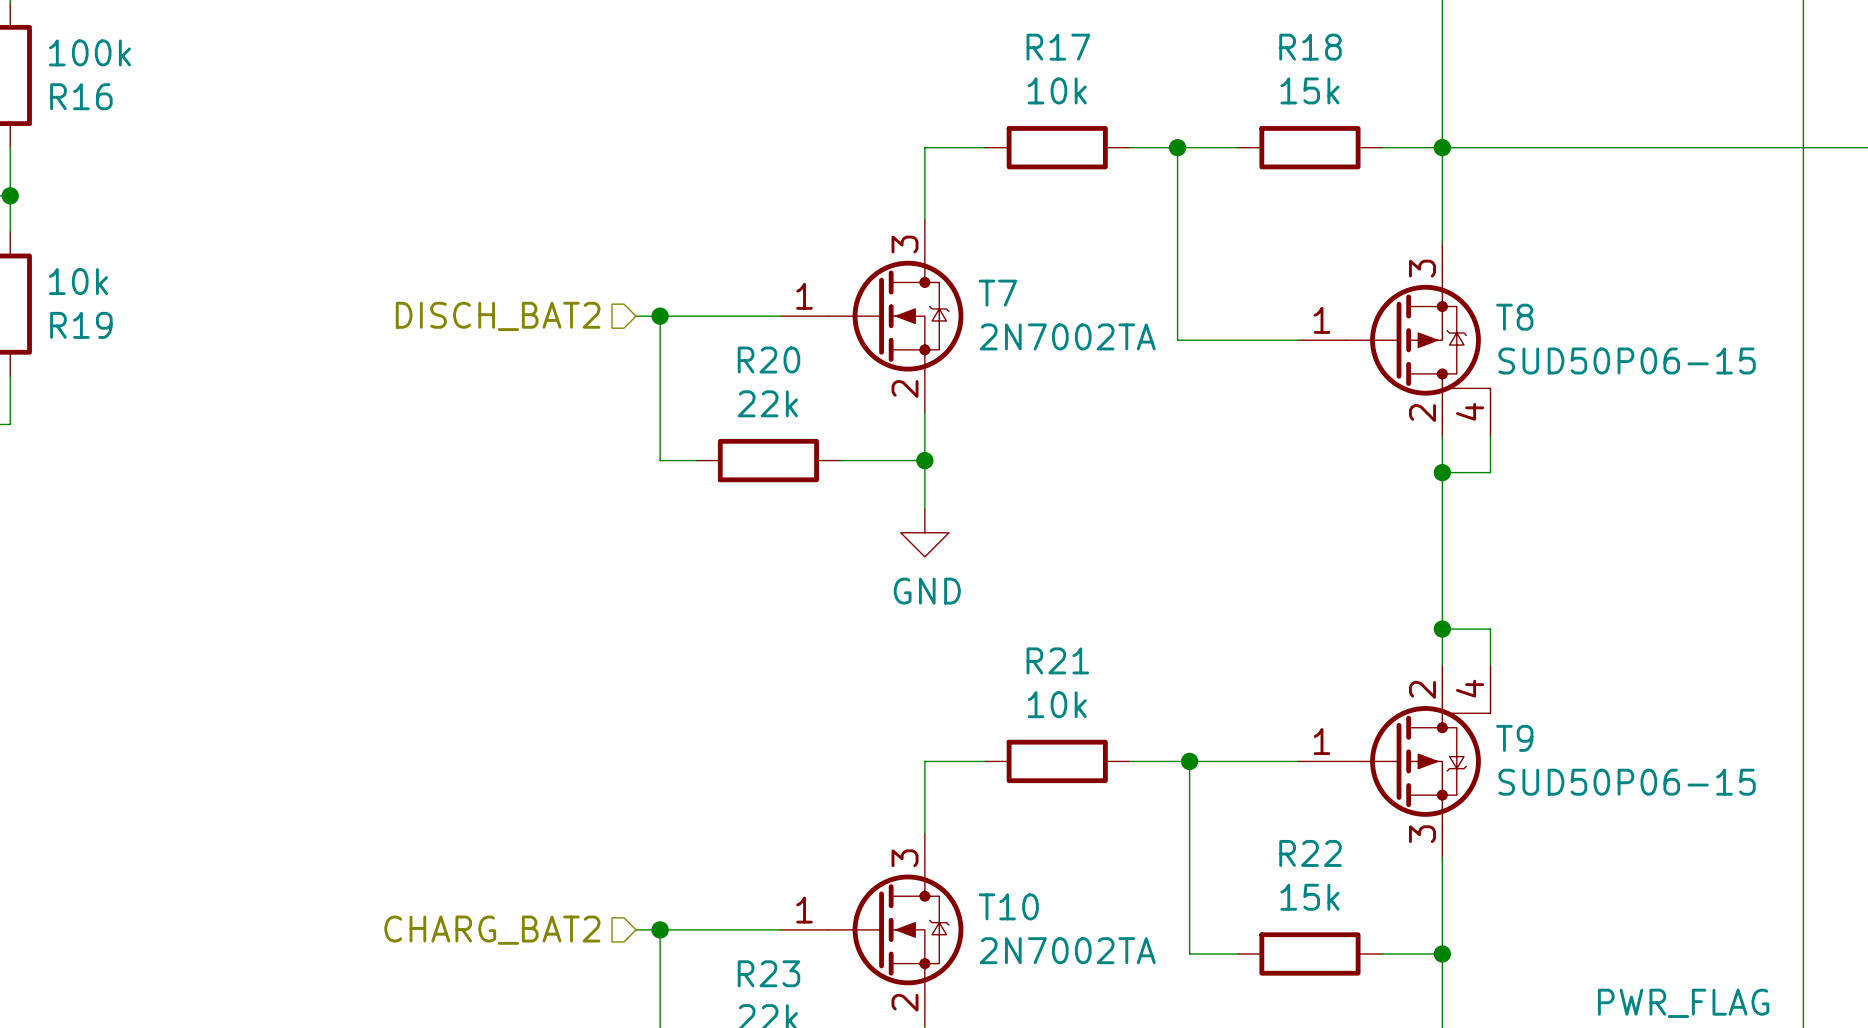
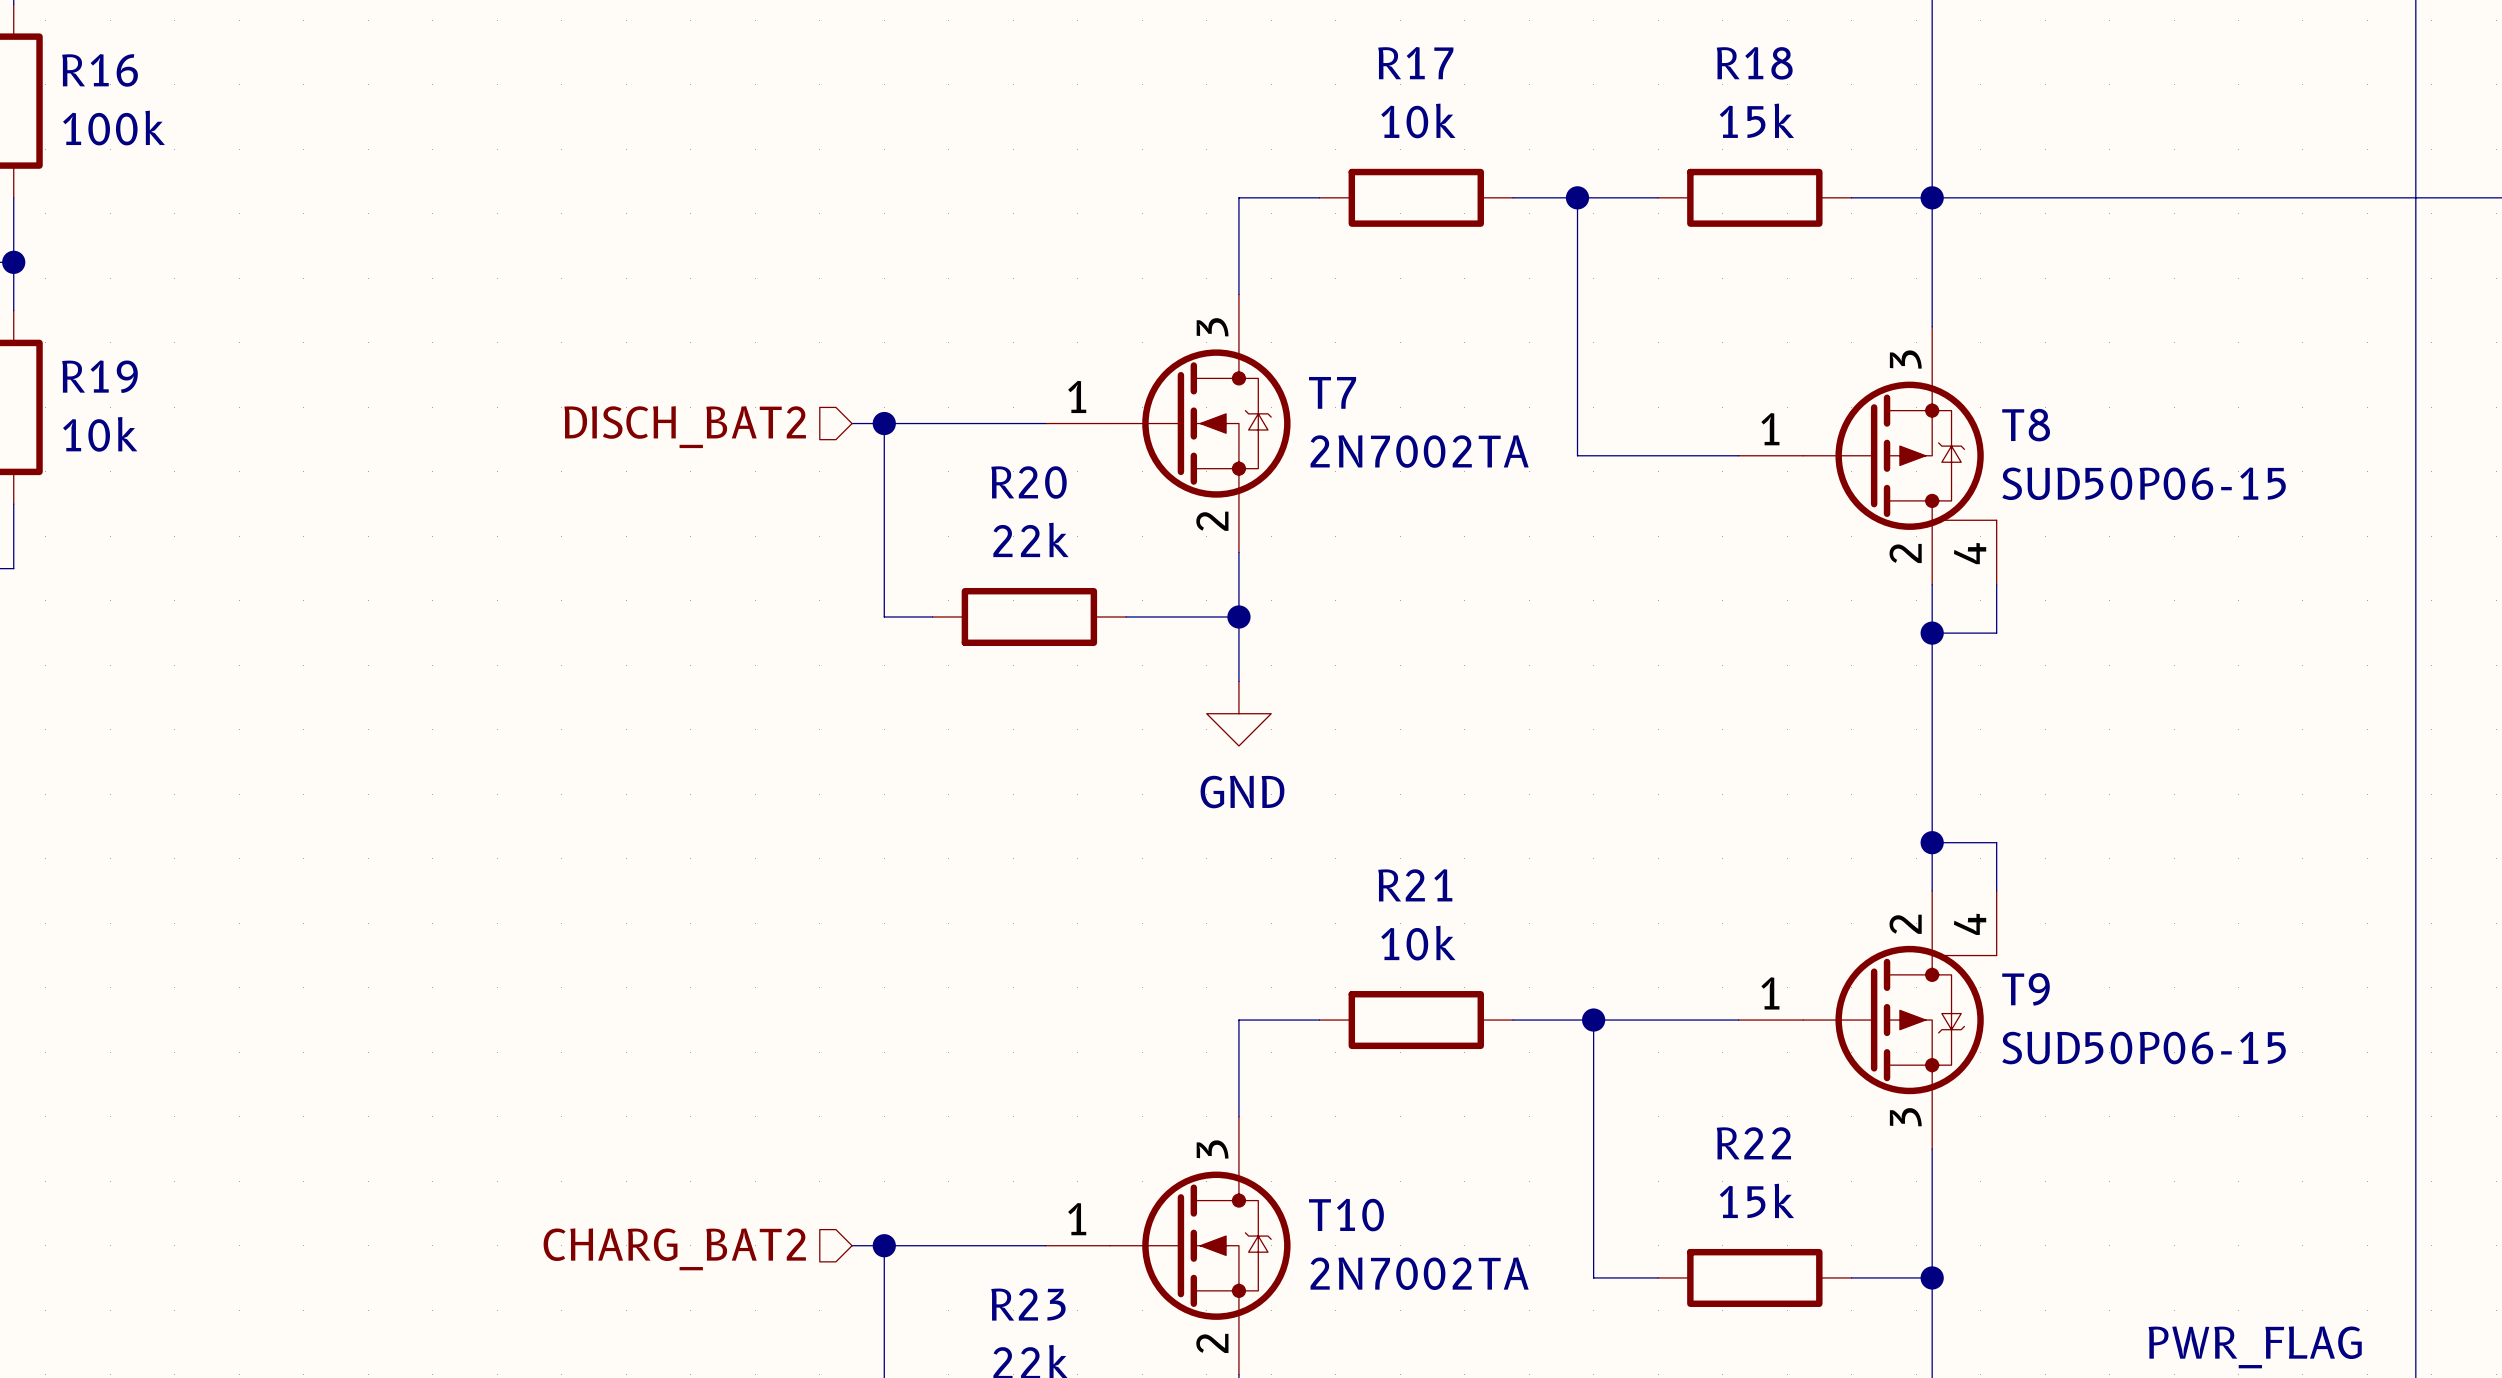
R16 value position: 100k (89, 52) -> 100k (113, 128)
R16 name position: R16 (81, 96) -> R16 (100, 70)
R19 value position: 10k (78, 281) -> 10k (100, 434)
R19 name position: R19 (81, 325) -> R19 (99, 376)

